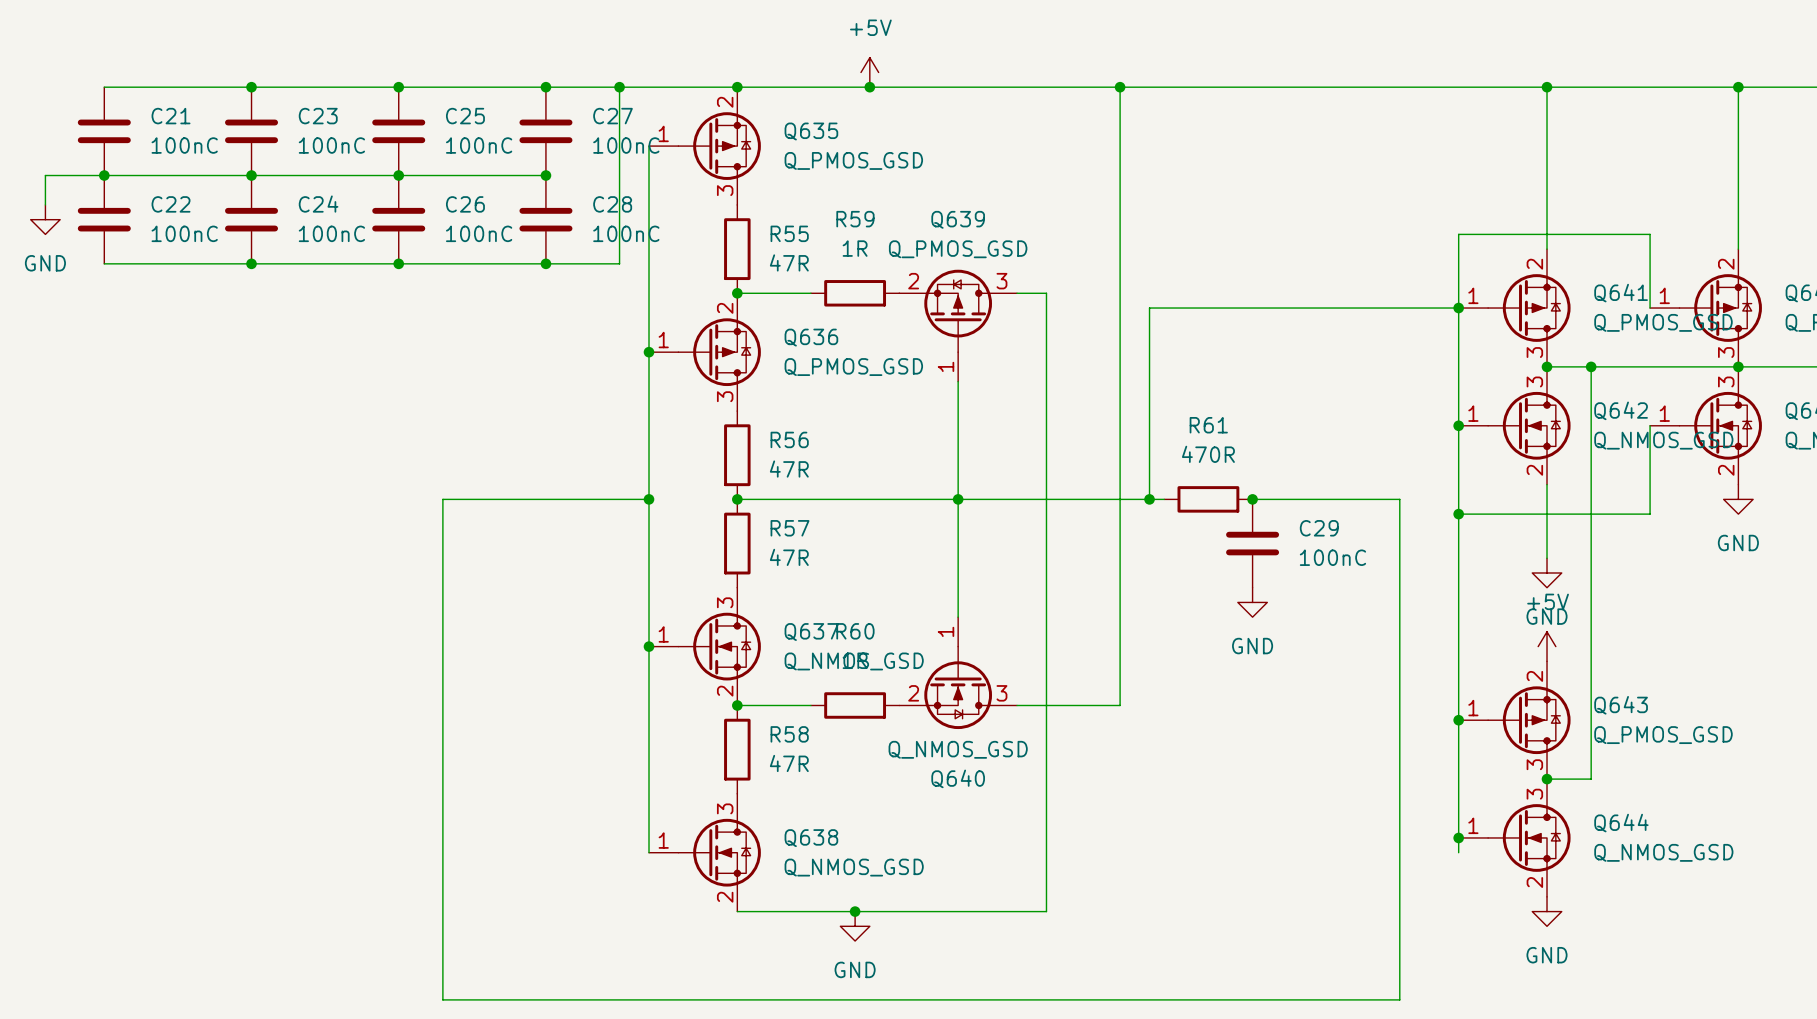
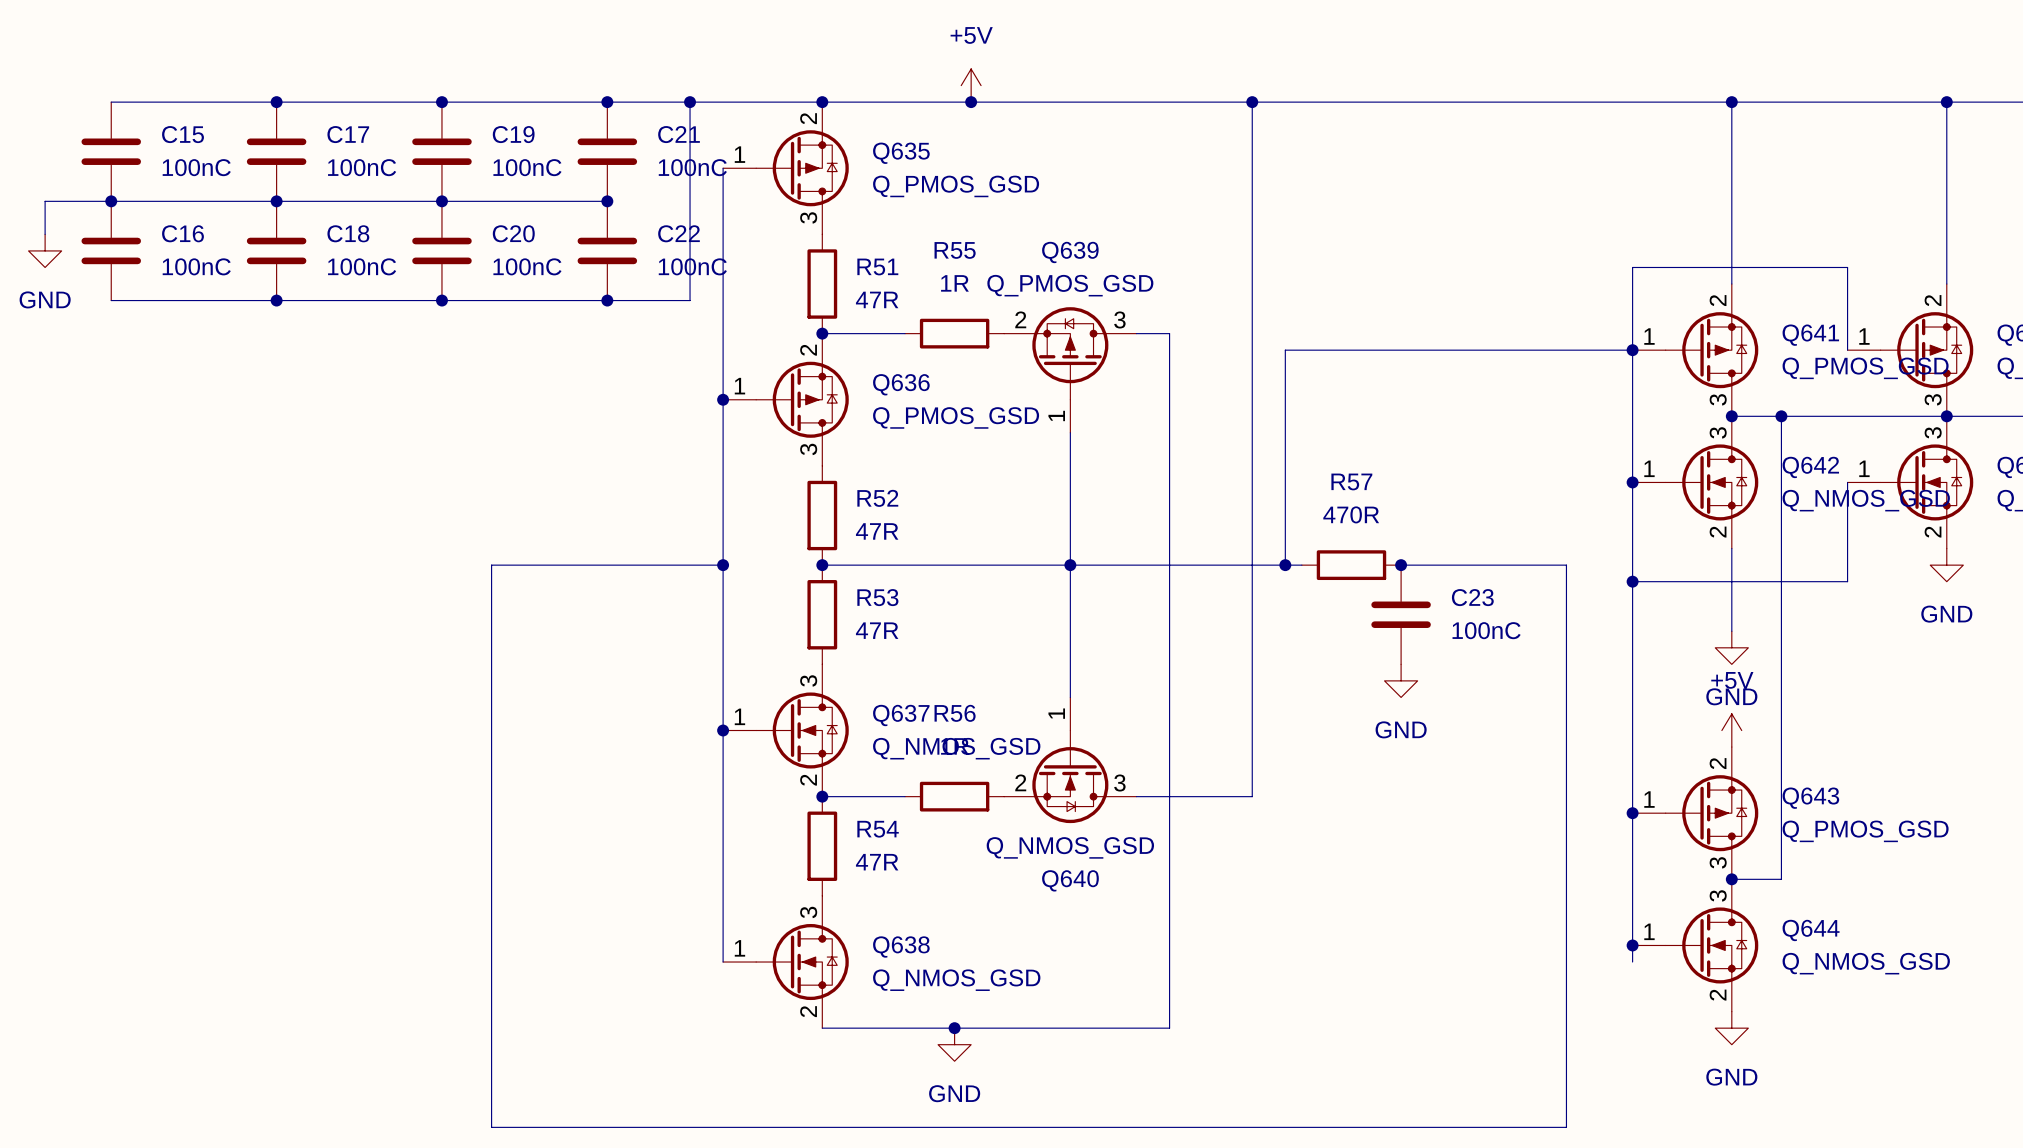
C21 name: C21 (171, 116) -> C15 (183, 134)
C23 name: C23 (318, 116) -> C17 (348, 134)
C25 name: C25 (465, 116) -> C19 (513, 134)
C27 name: C27 (613, 116) -> C21 (679, 134)
C22 name: C22 (171, 204) -> C16 (182, 233)
C24 name: C24 (318, 204) -> C18 (348, 233)
C26 name: C26 (465, 204) -> C20 (513, 233)
C28 name: C28 (612, 204) -> C22 (679, 233)
R59 name: R59 (855, 219) -> R55 (955, 250)
R55 name: R55 (789, 233) -> R51 (877, 266)
R61 name: R61 (1208, 425) -> R57 (1351, 481)
R56 name: R56 (789, 439) -> R52 (877, 498)
R57 name: R57 (790, 528) -> R53 (877, 597)
C29 name: C29 (1319, 528) -> C23 (1472, 597)
R60 name: R60 (855, 631) -> R56 (955, 713)
R58 name: R58 (789, 734) -> R54 (878, 829)

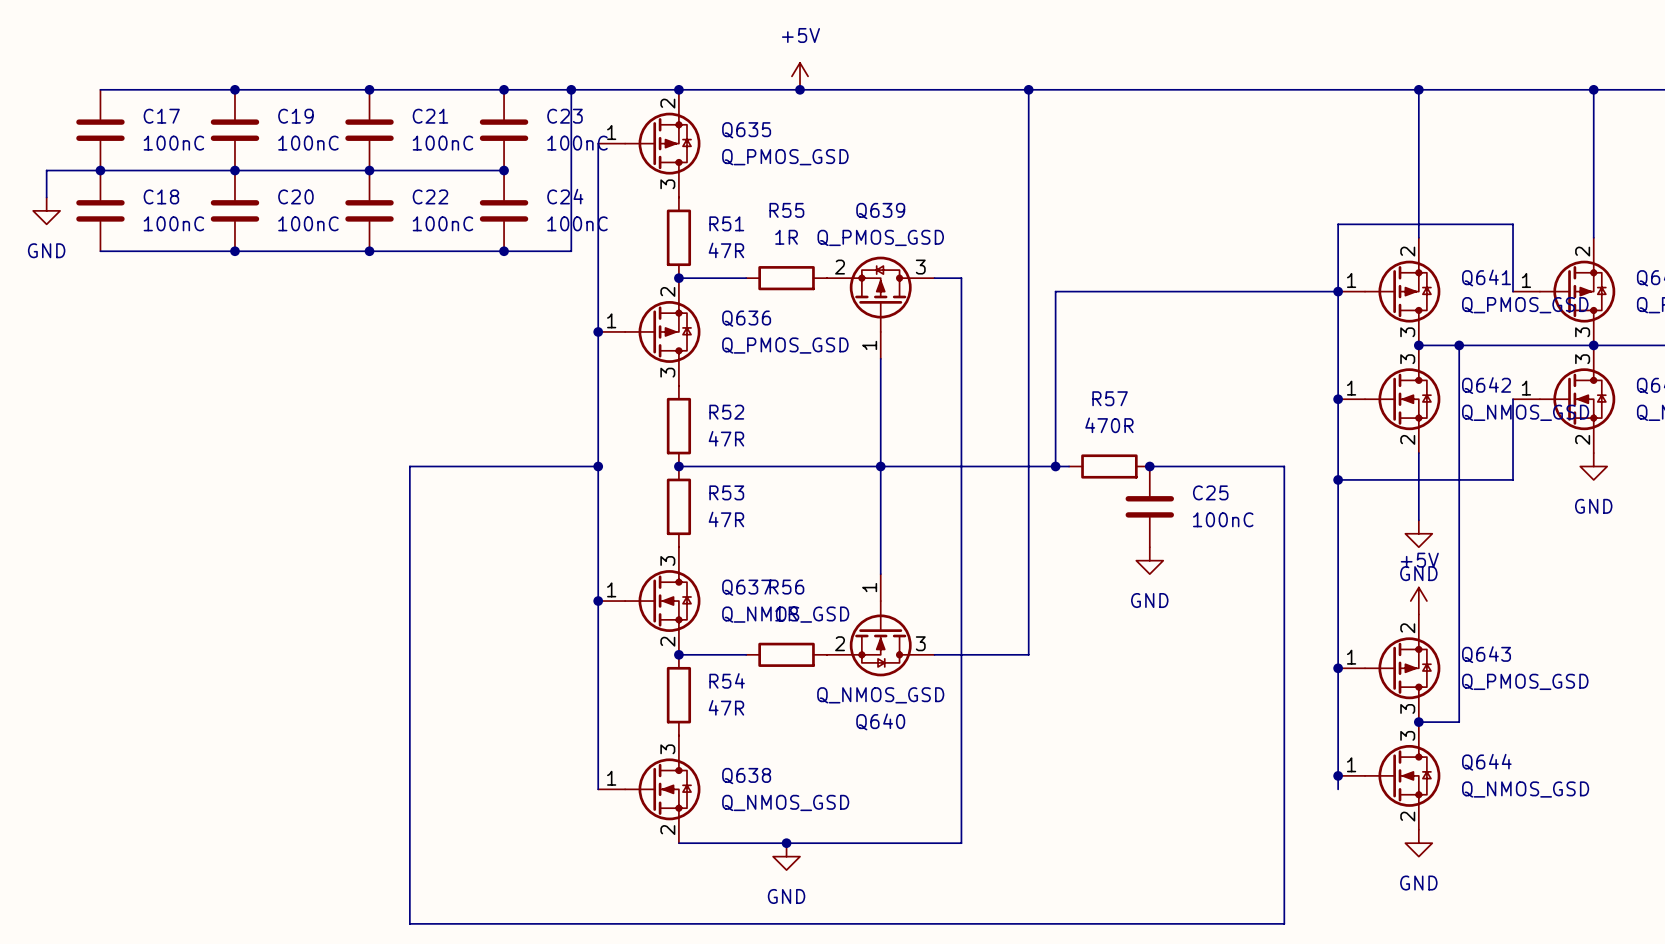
C15 name: C15 (183, 134) -> C17 (161, 116)
C17 name: C17 (348, 134) -> C19 (295, 116)
C19 name: C19 (513, 134) -> C21 (430, 116)
C21 name: C21 (679, 134) -> C23 (565, 116)
C16 name: C16 (182, 233) -> C18 (161, 196)
C18 name: C18 (348, 233) -> C20 (295, 196)
C20 name: C20 (513, 233) -> C22 (430, 196)
C22 name: C22 (679, 233) -> C24 (565, 196)
C23 name: C23 (1472, 597) -> C25 (1210, 492)

